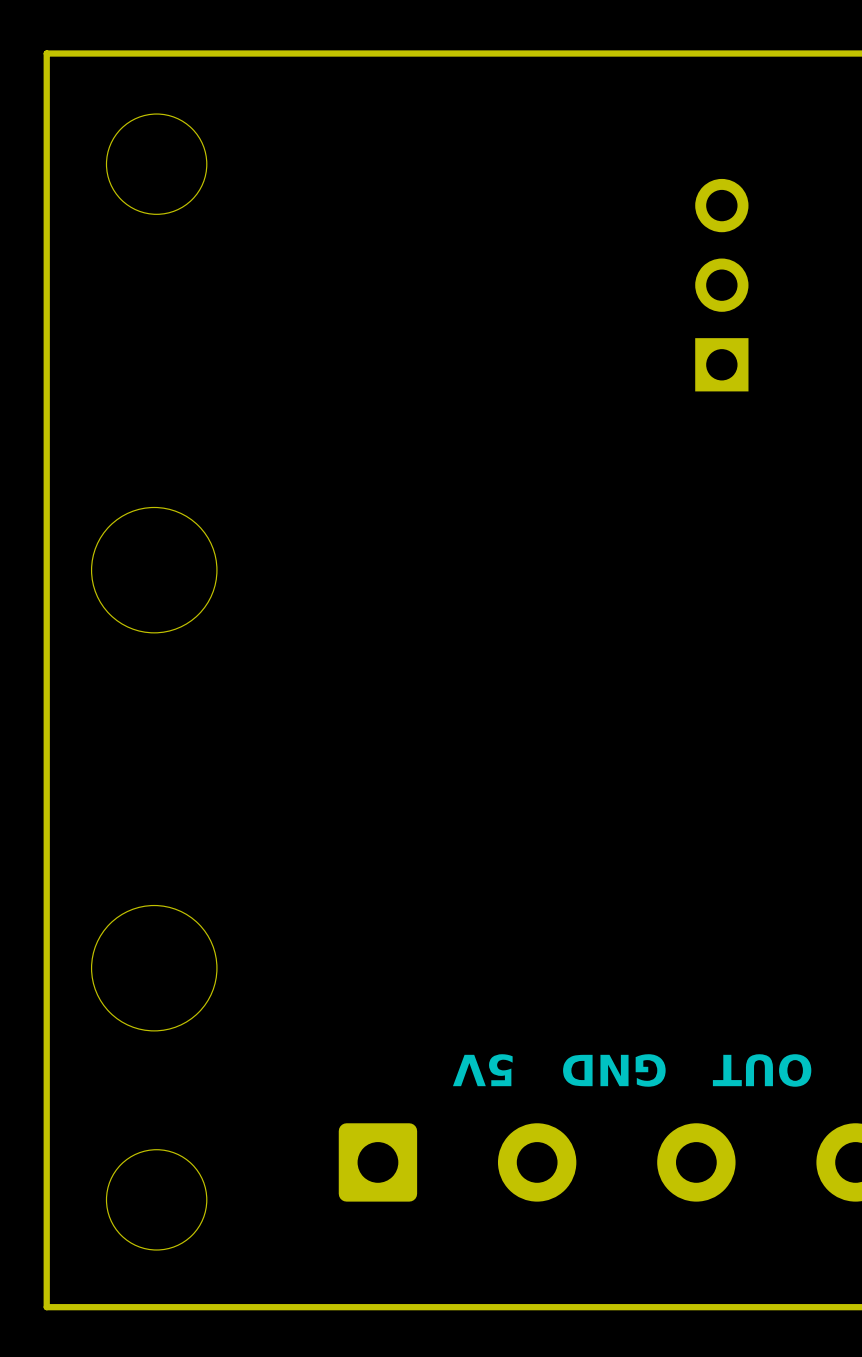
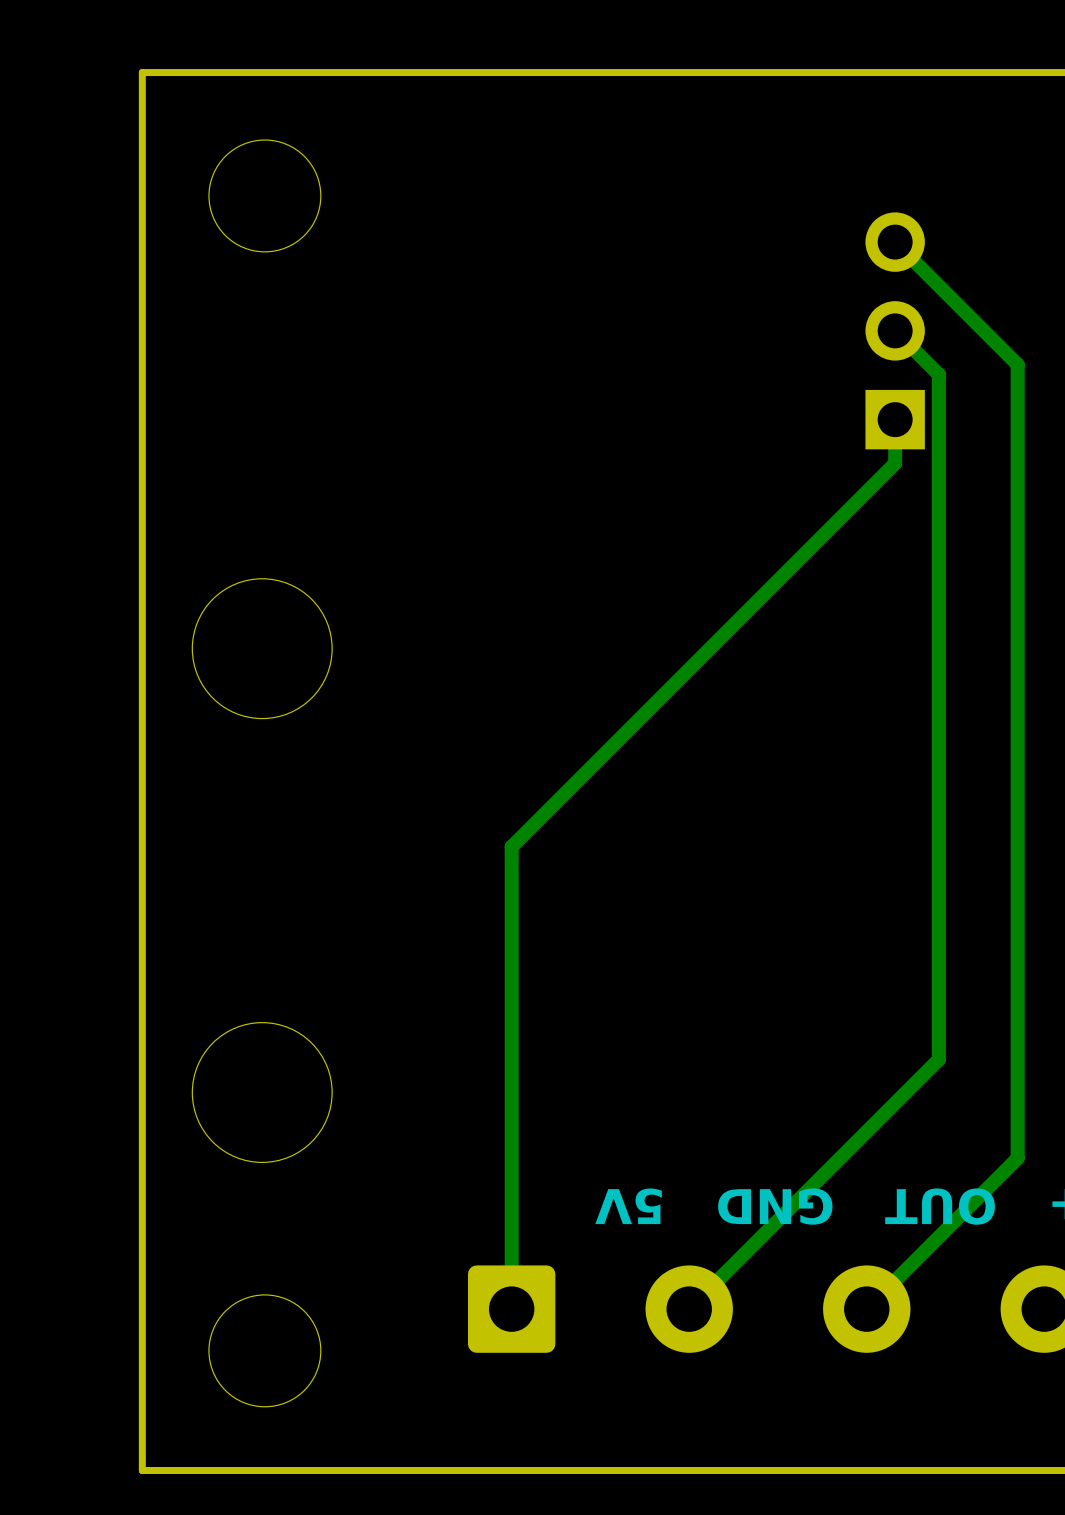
track: none -> (895, 242) (1017, 364) (1017, 1158) (866, 1309)
track: none -> (895, 330) (938, 374) (938, 1059) (689, 1309)
track: none -> (895, 419) (895, 463) (511, 846) (511, 1309)

